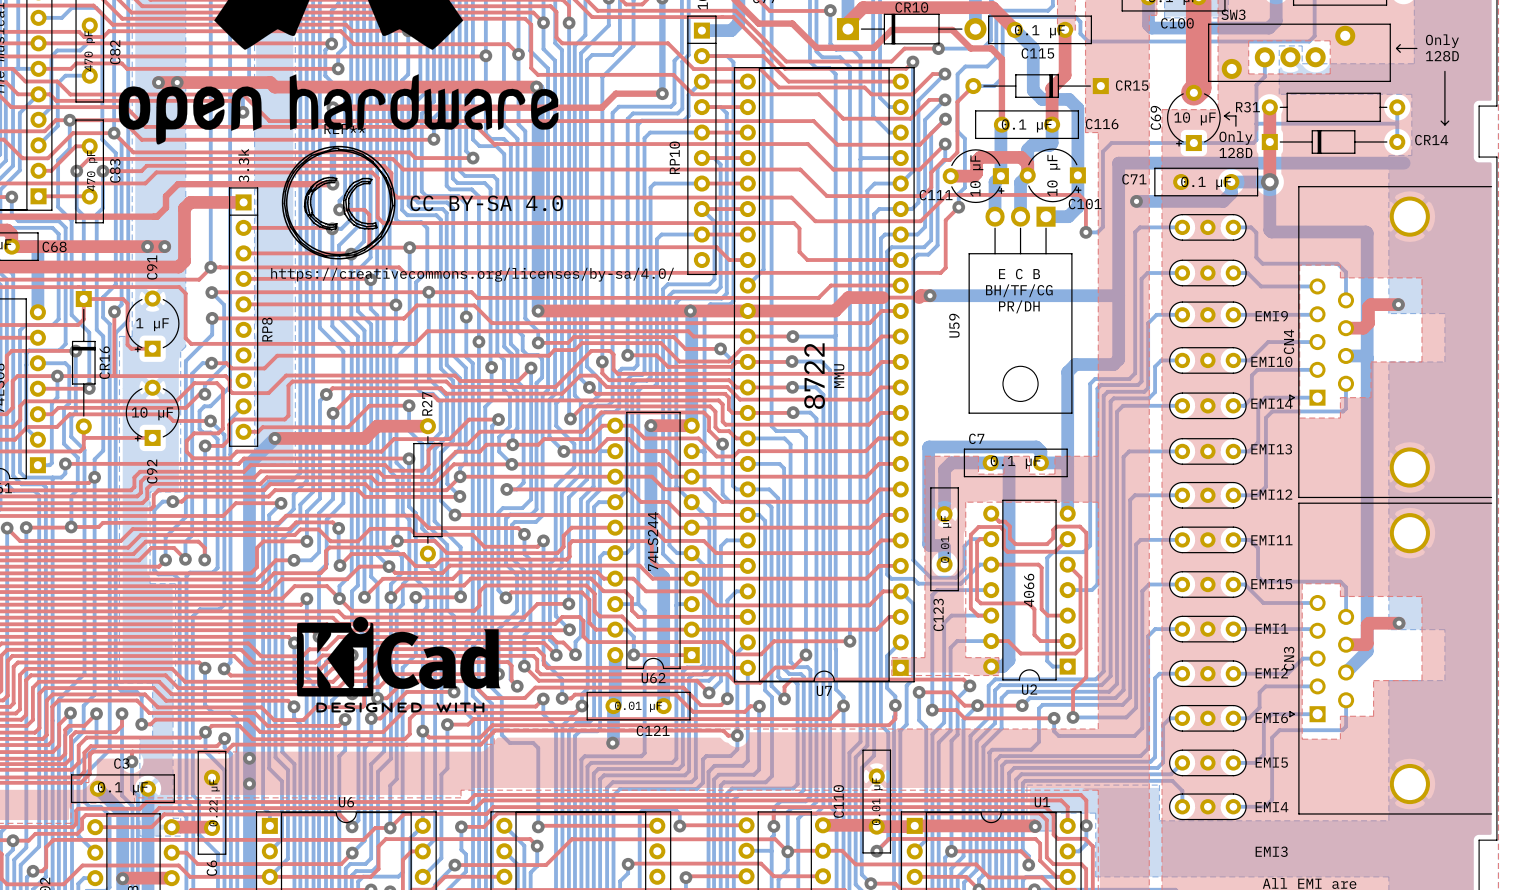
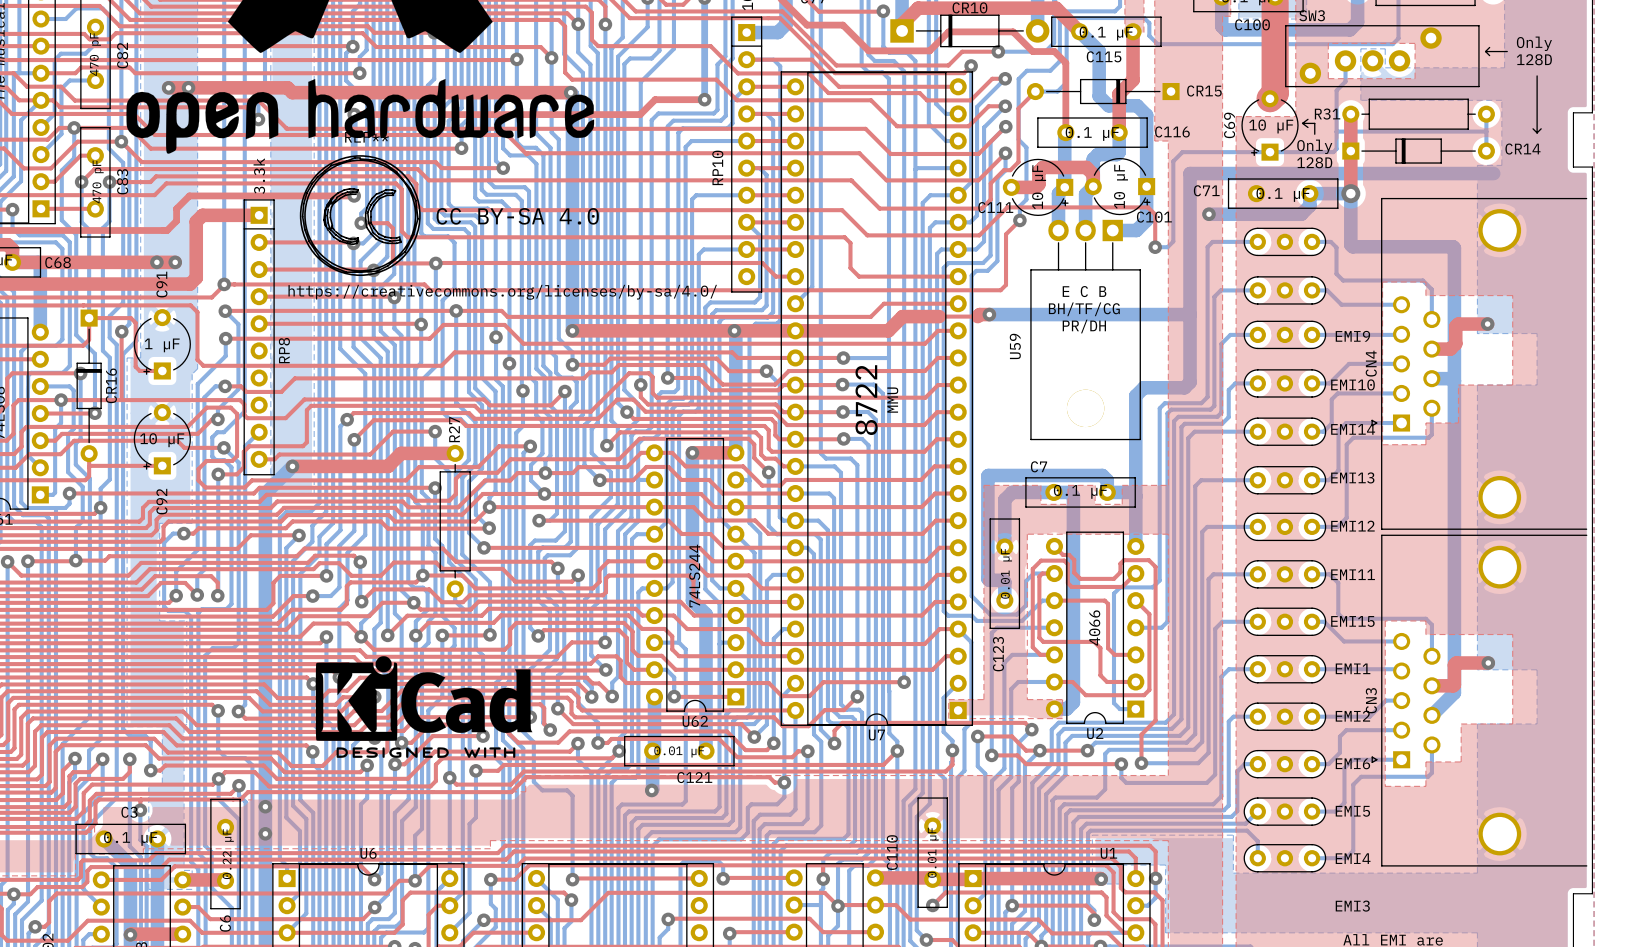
U59 footprint: [968, 206, 1073, 414] -> [1030, 219, 1141, 441]

